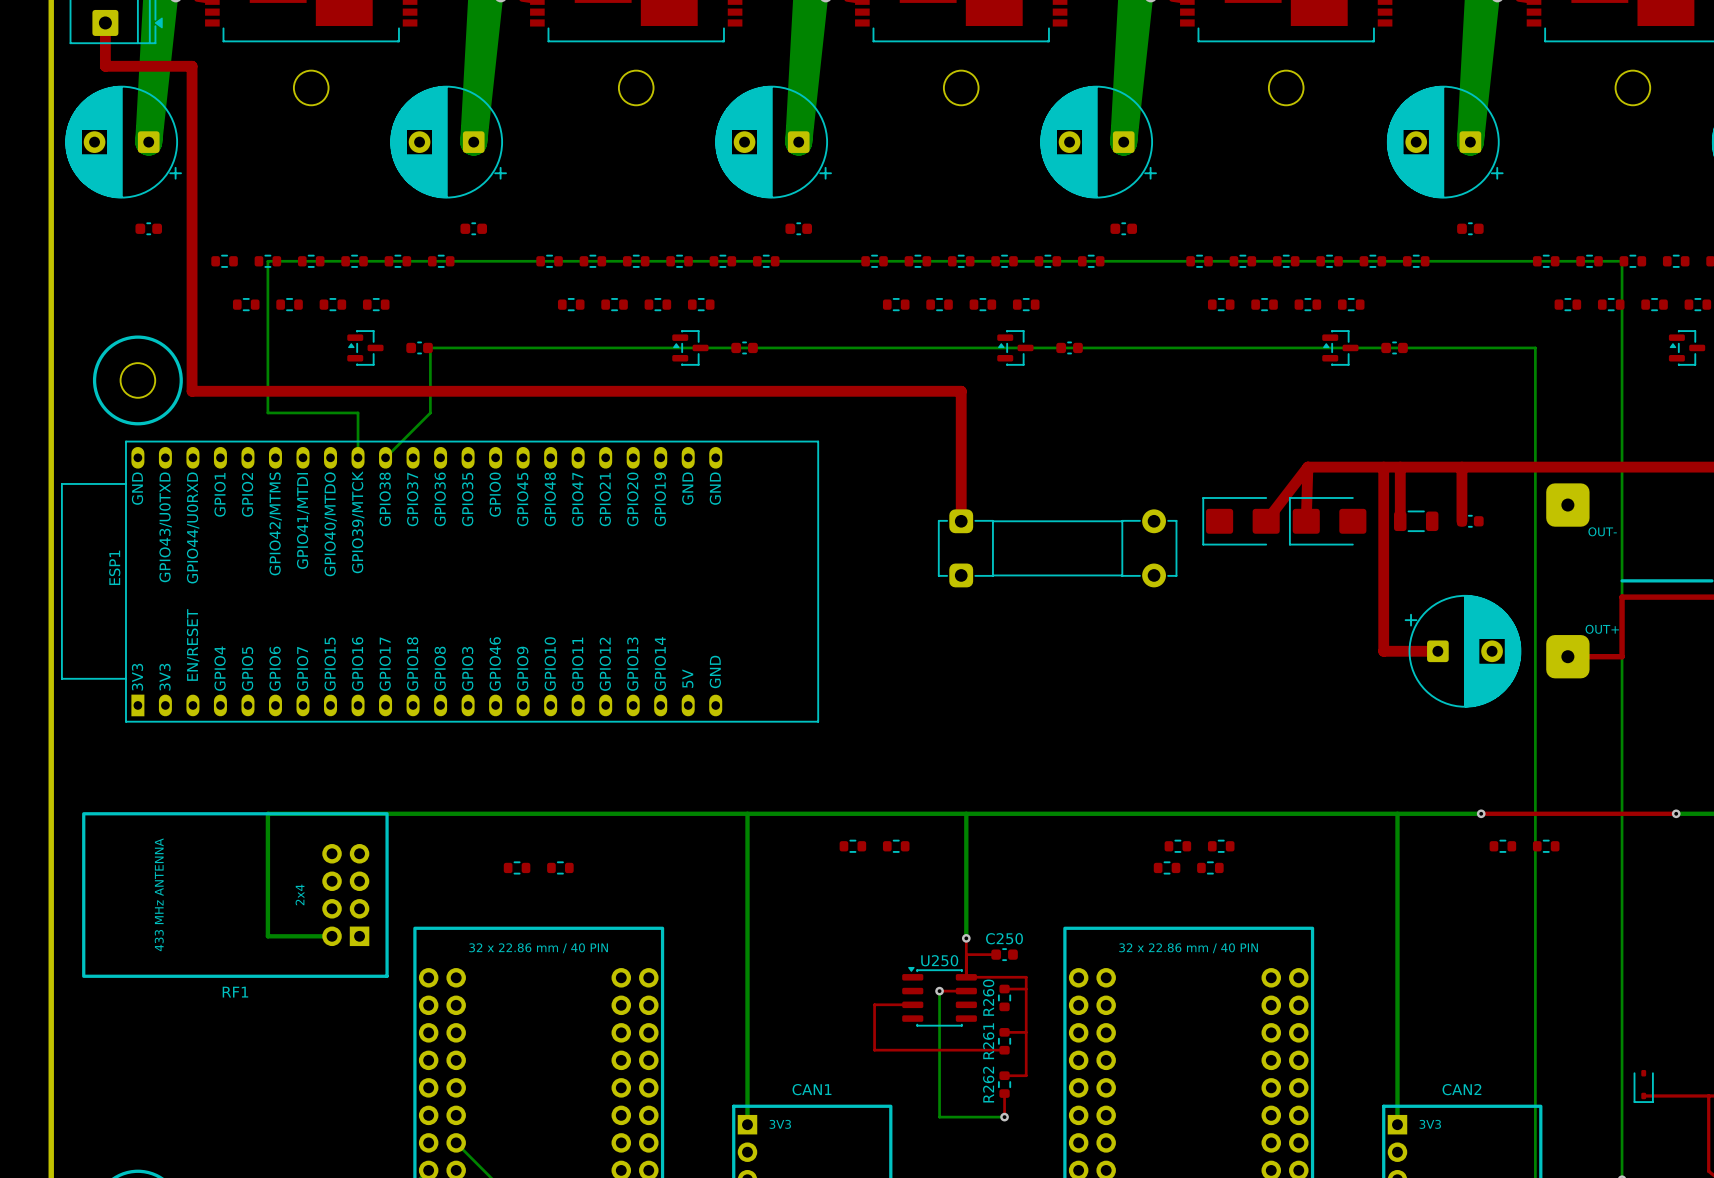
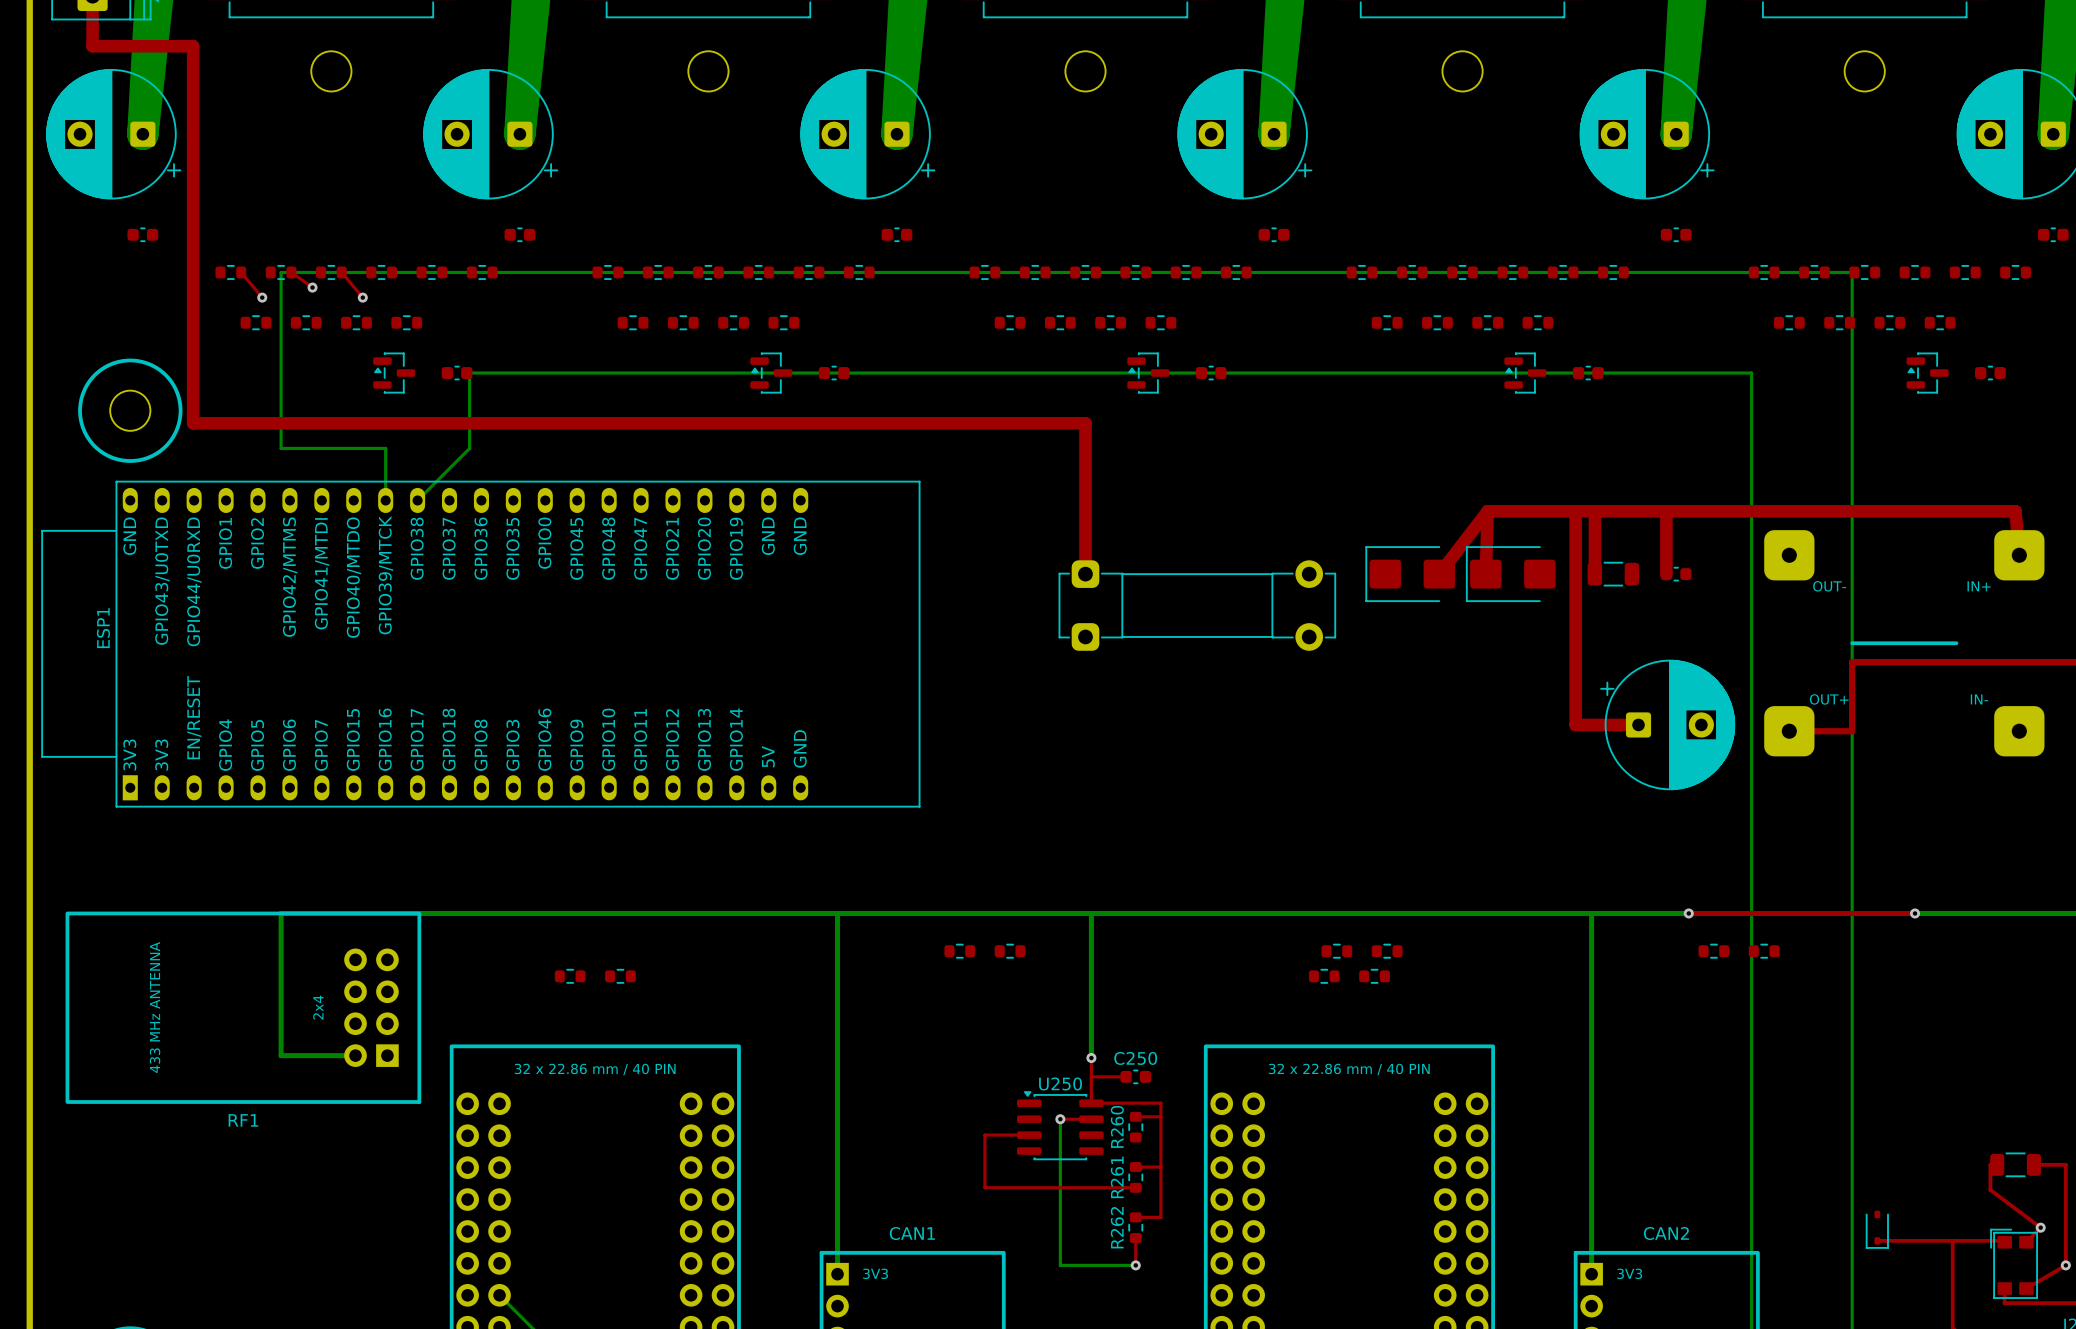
top track: none -> (241, 272) (262, 297)
top track: none -> (291, 272) (312, 287)
top track: none -> (341, 272) (362, 297)
via: none -> (312, 287)
via: none -> (262, 297)
via: none -> (362, 297)

